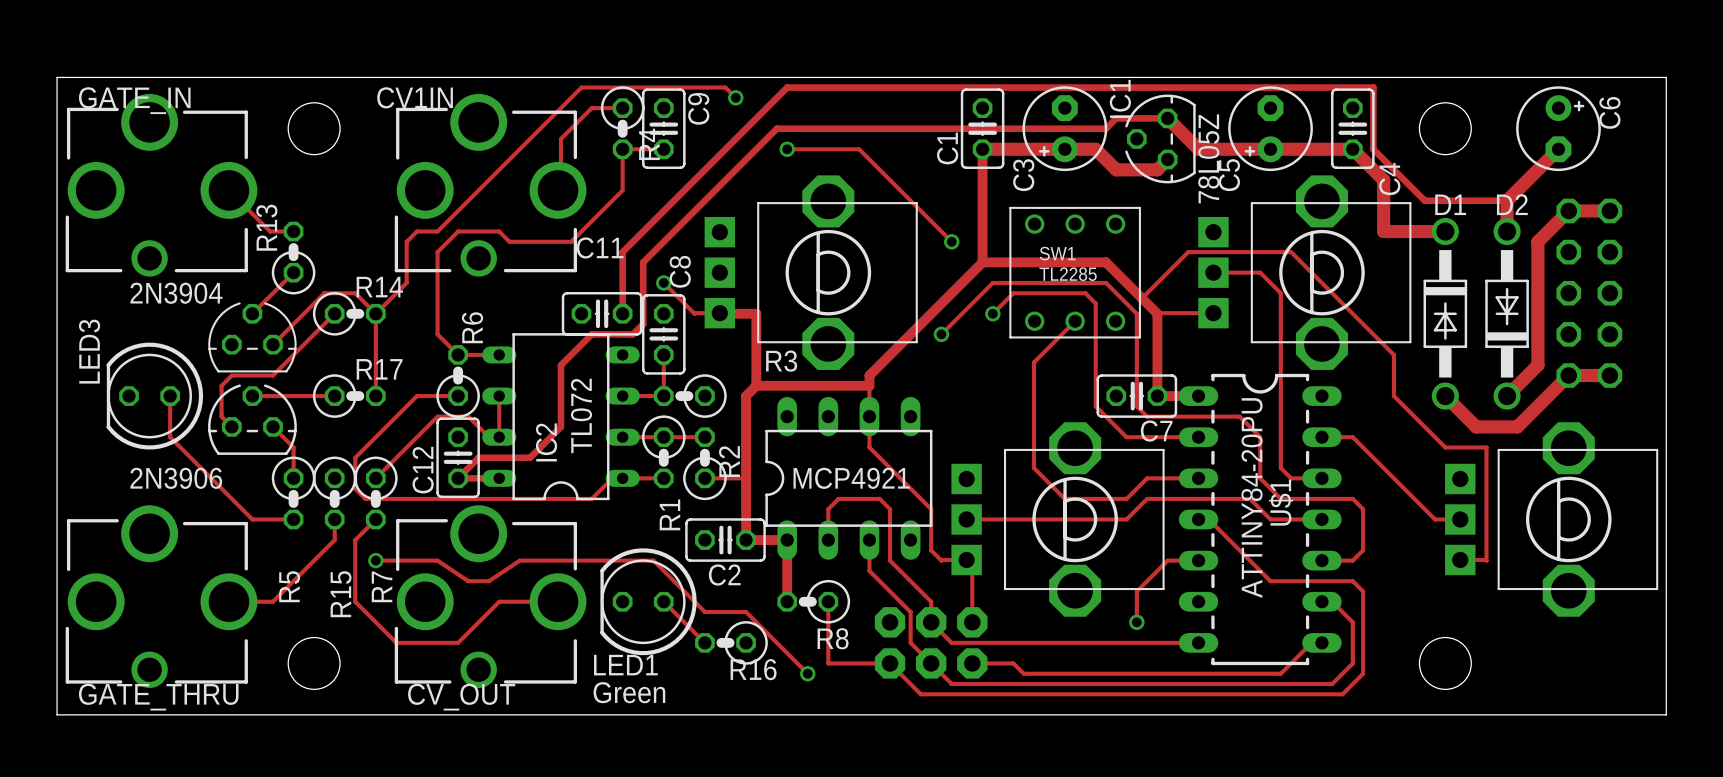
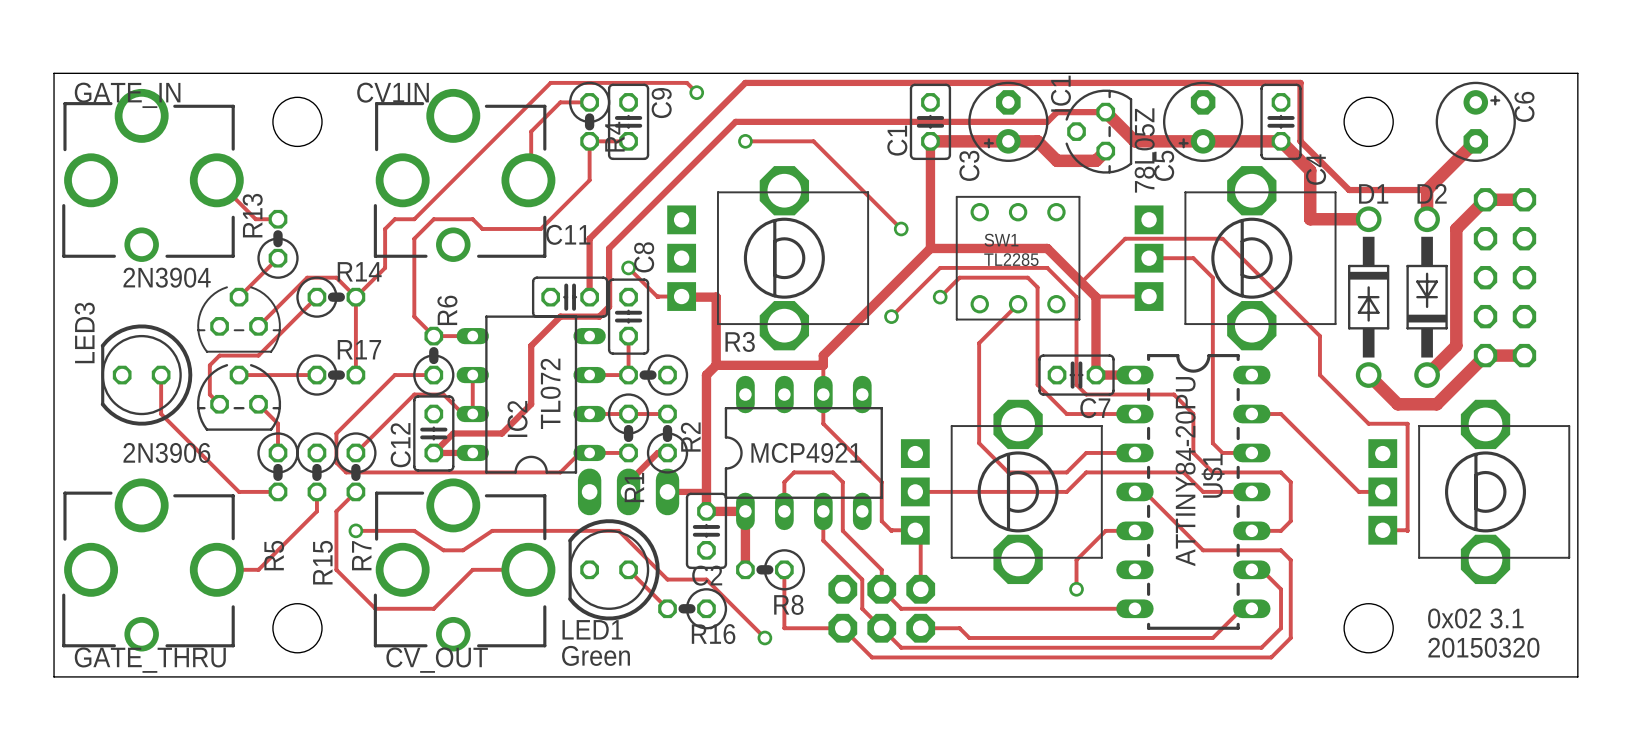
track: (704, 478) (746, 478) -> (667, 452) (657, 452) (628, 482) (628, 491)
part: none -> (628, 491)
track: none -> (667, 491) (706, 491)
C2 rotation: 0° (725, 540) -> 90° clockwise (706, 530)
text: none -> 0x02 3.1 (1475, 618)
text: none -> 20150320 (1483, 647)

